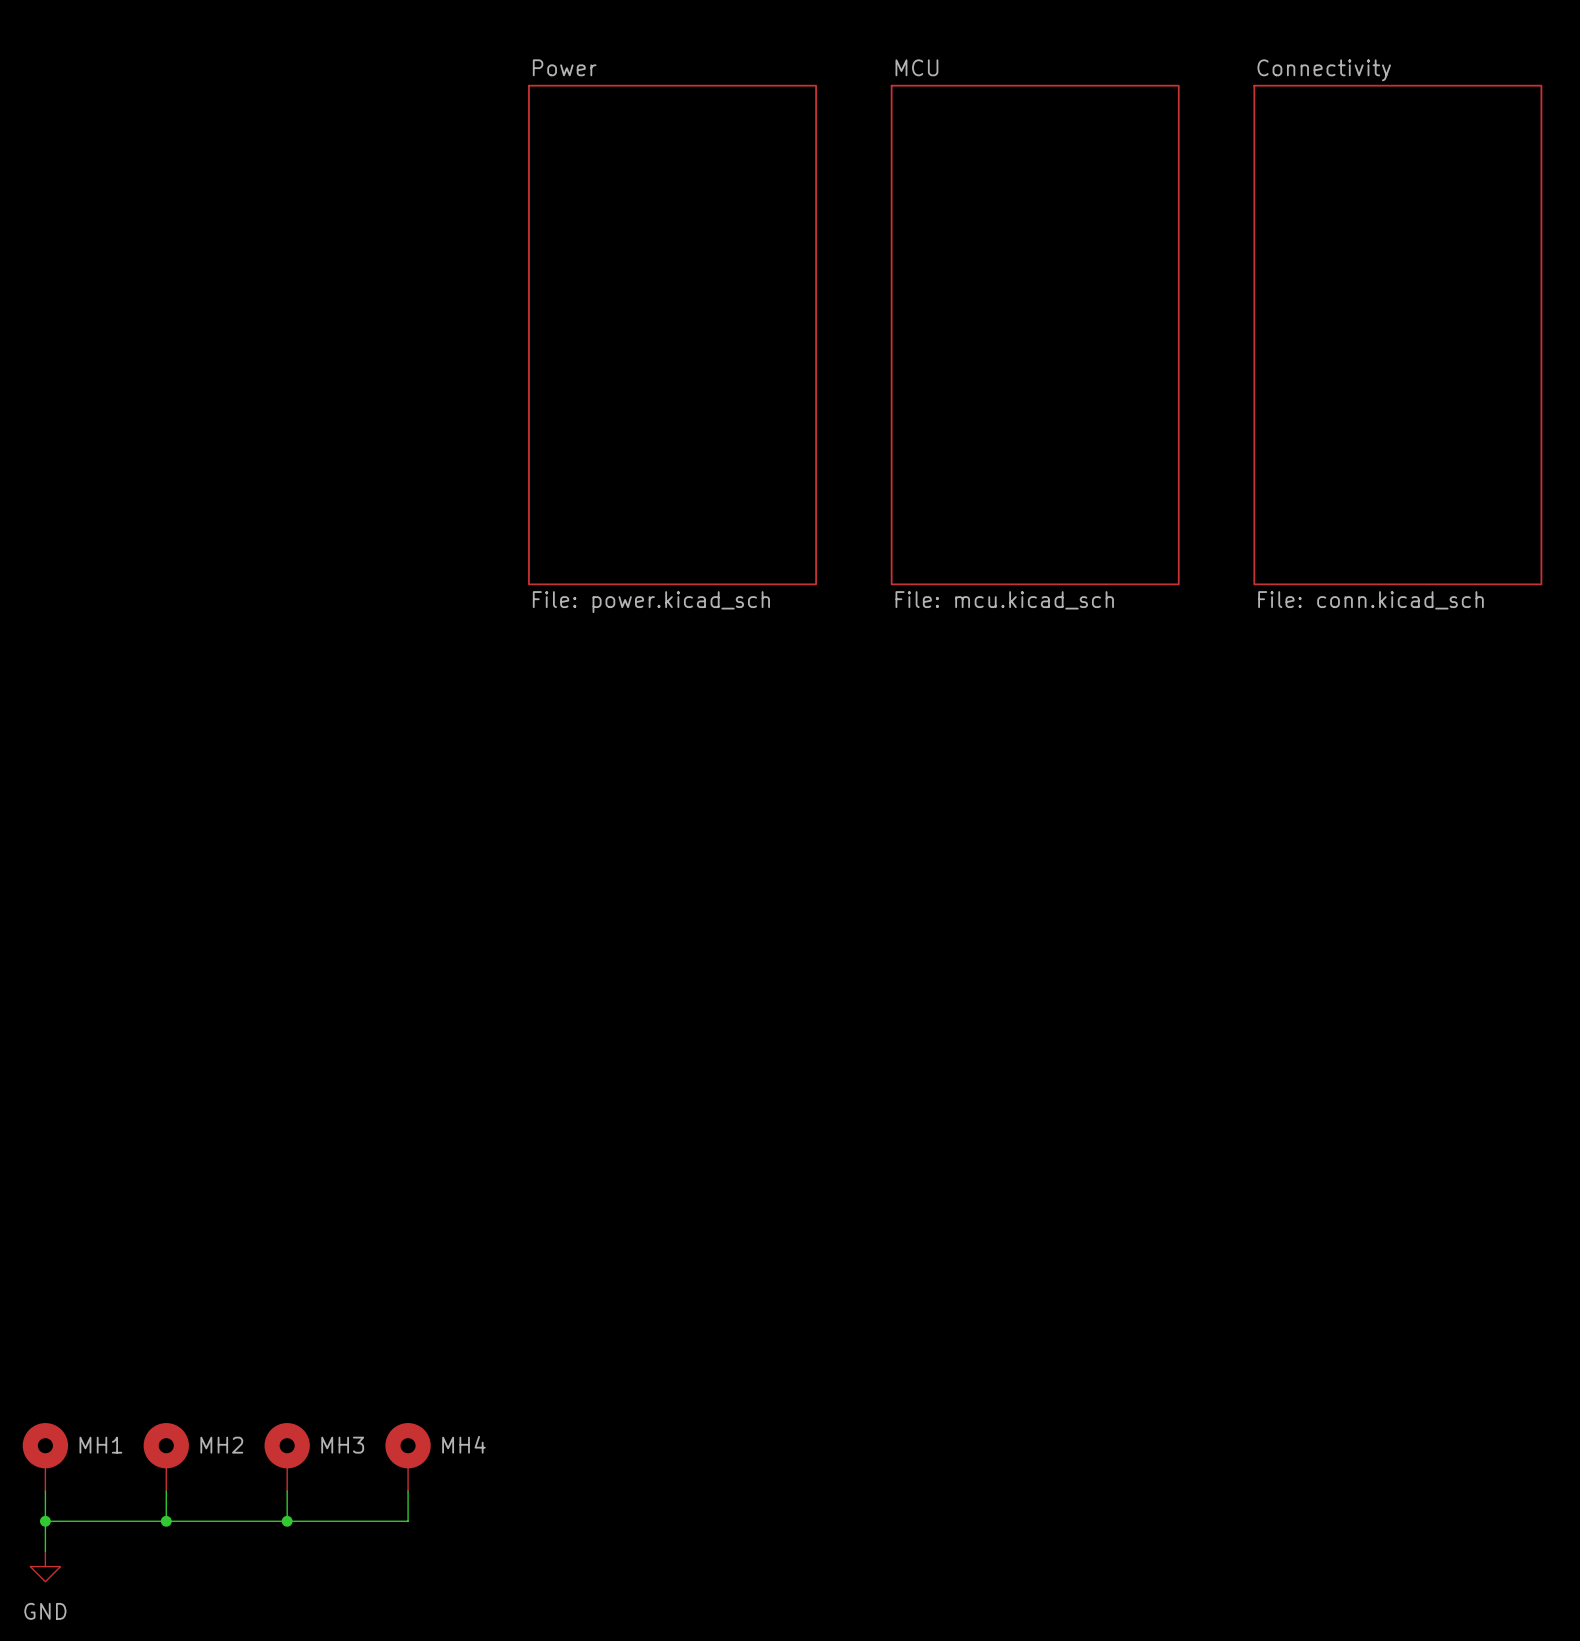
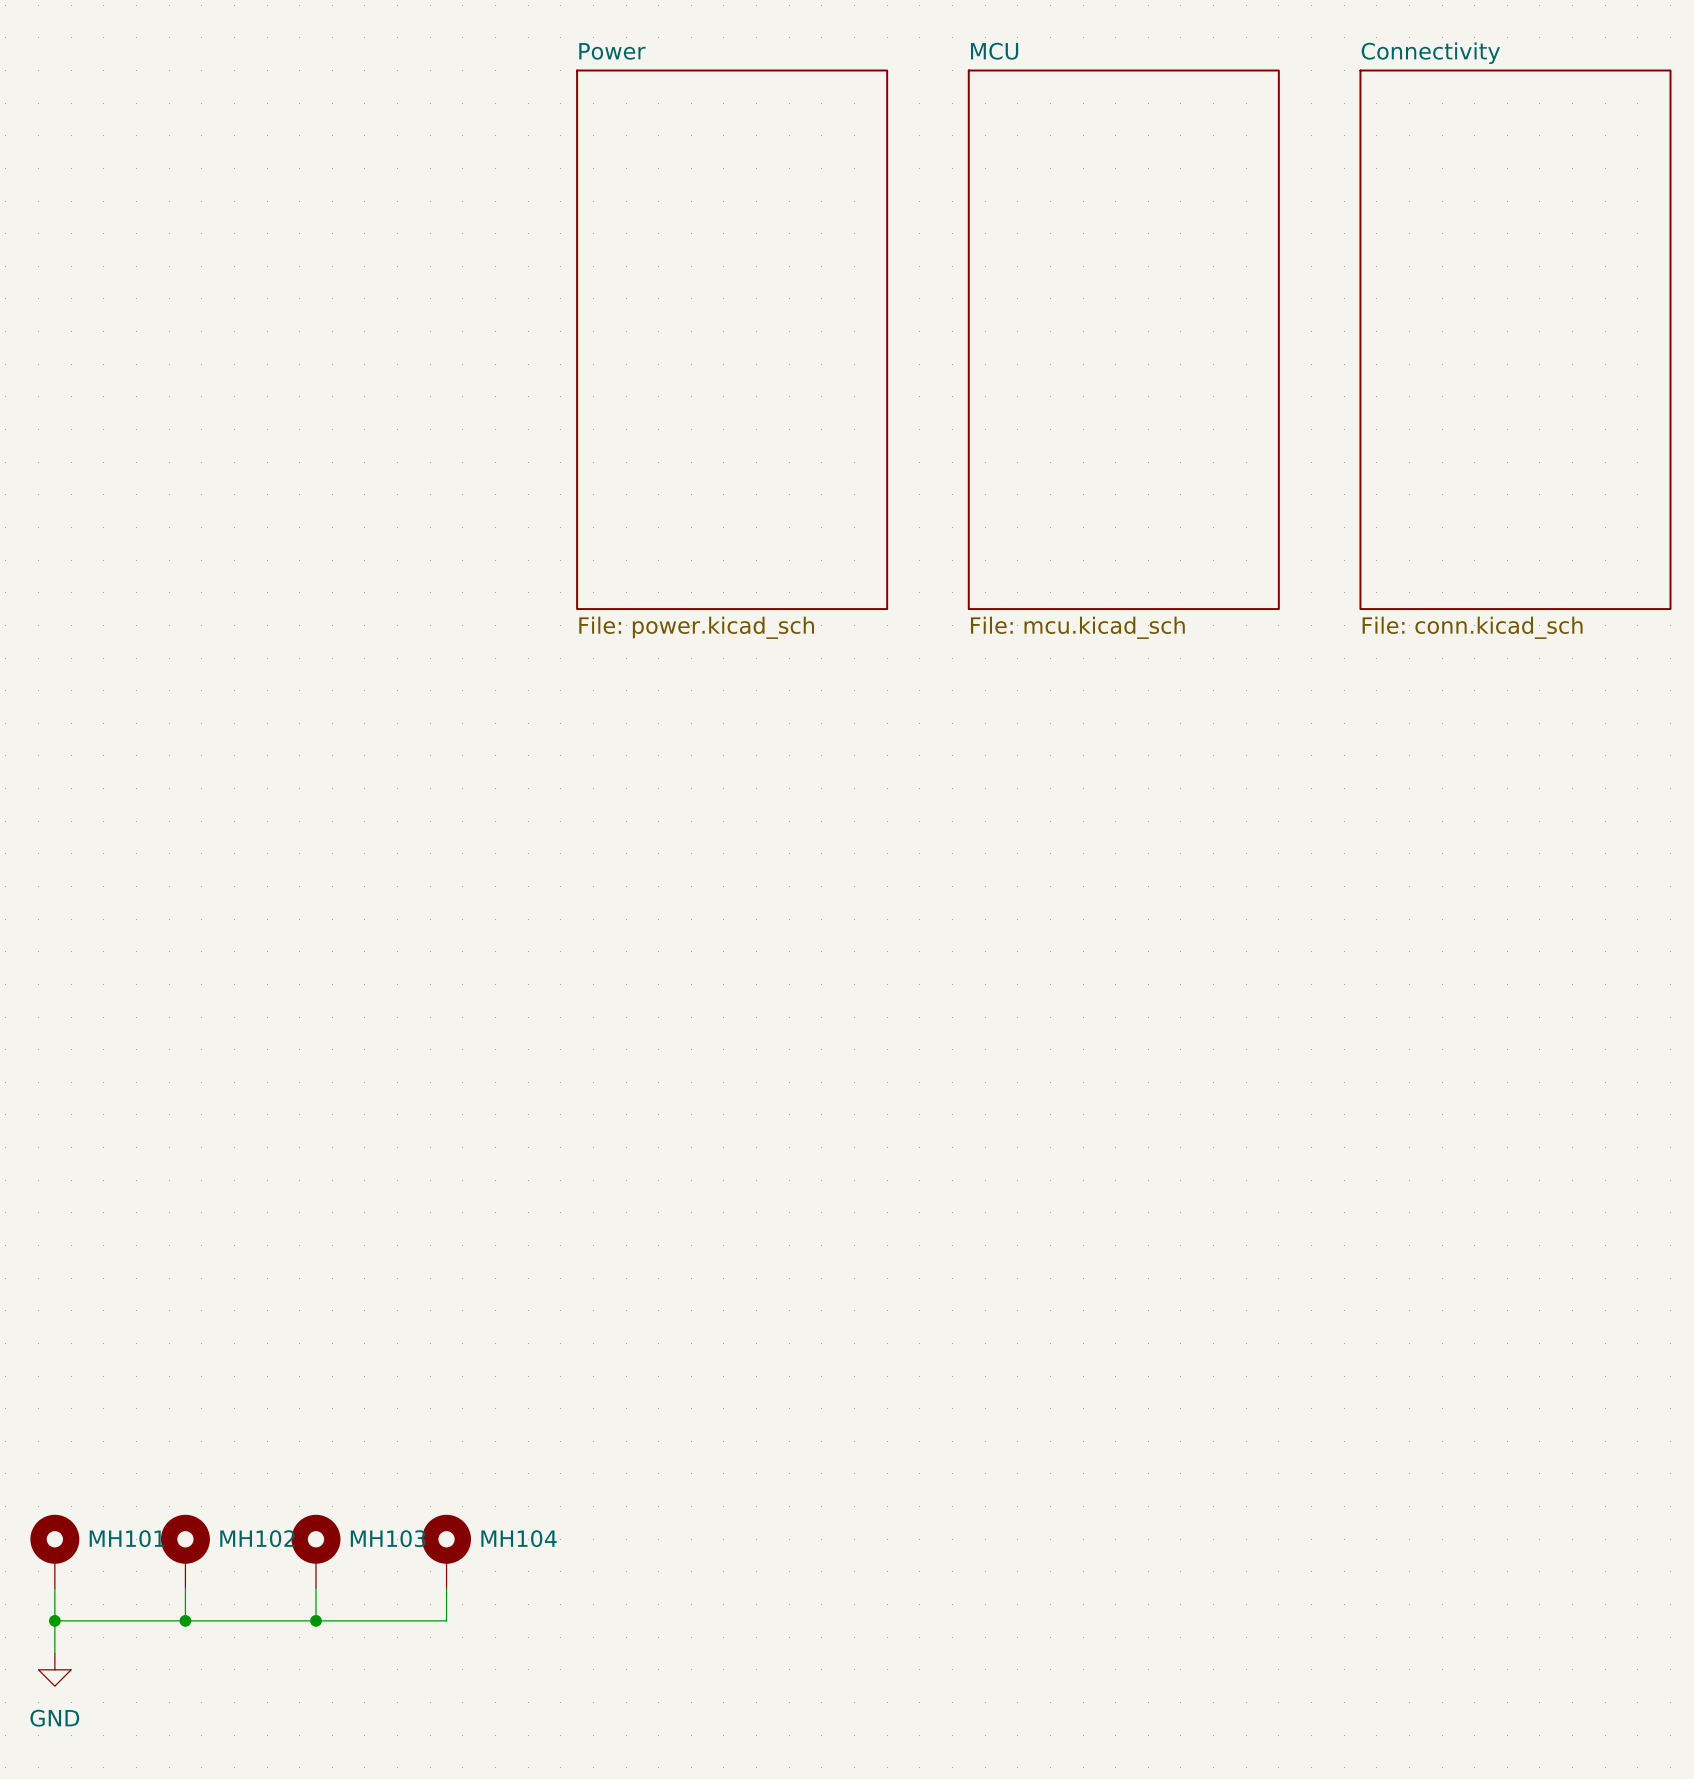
MH4 name: MH4 (463, 1444) -> MH104 (519, 1538)
MH1 name: MH1 (100, 1445) -> MH101 (127, 1538)
MH2 name: MH2 (221, 1445) -> MH102 (257, 1538)
MH3 name: MH3 (342, 1445) -> MH103 (388, 1538)

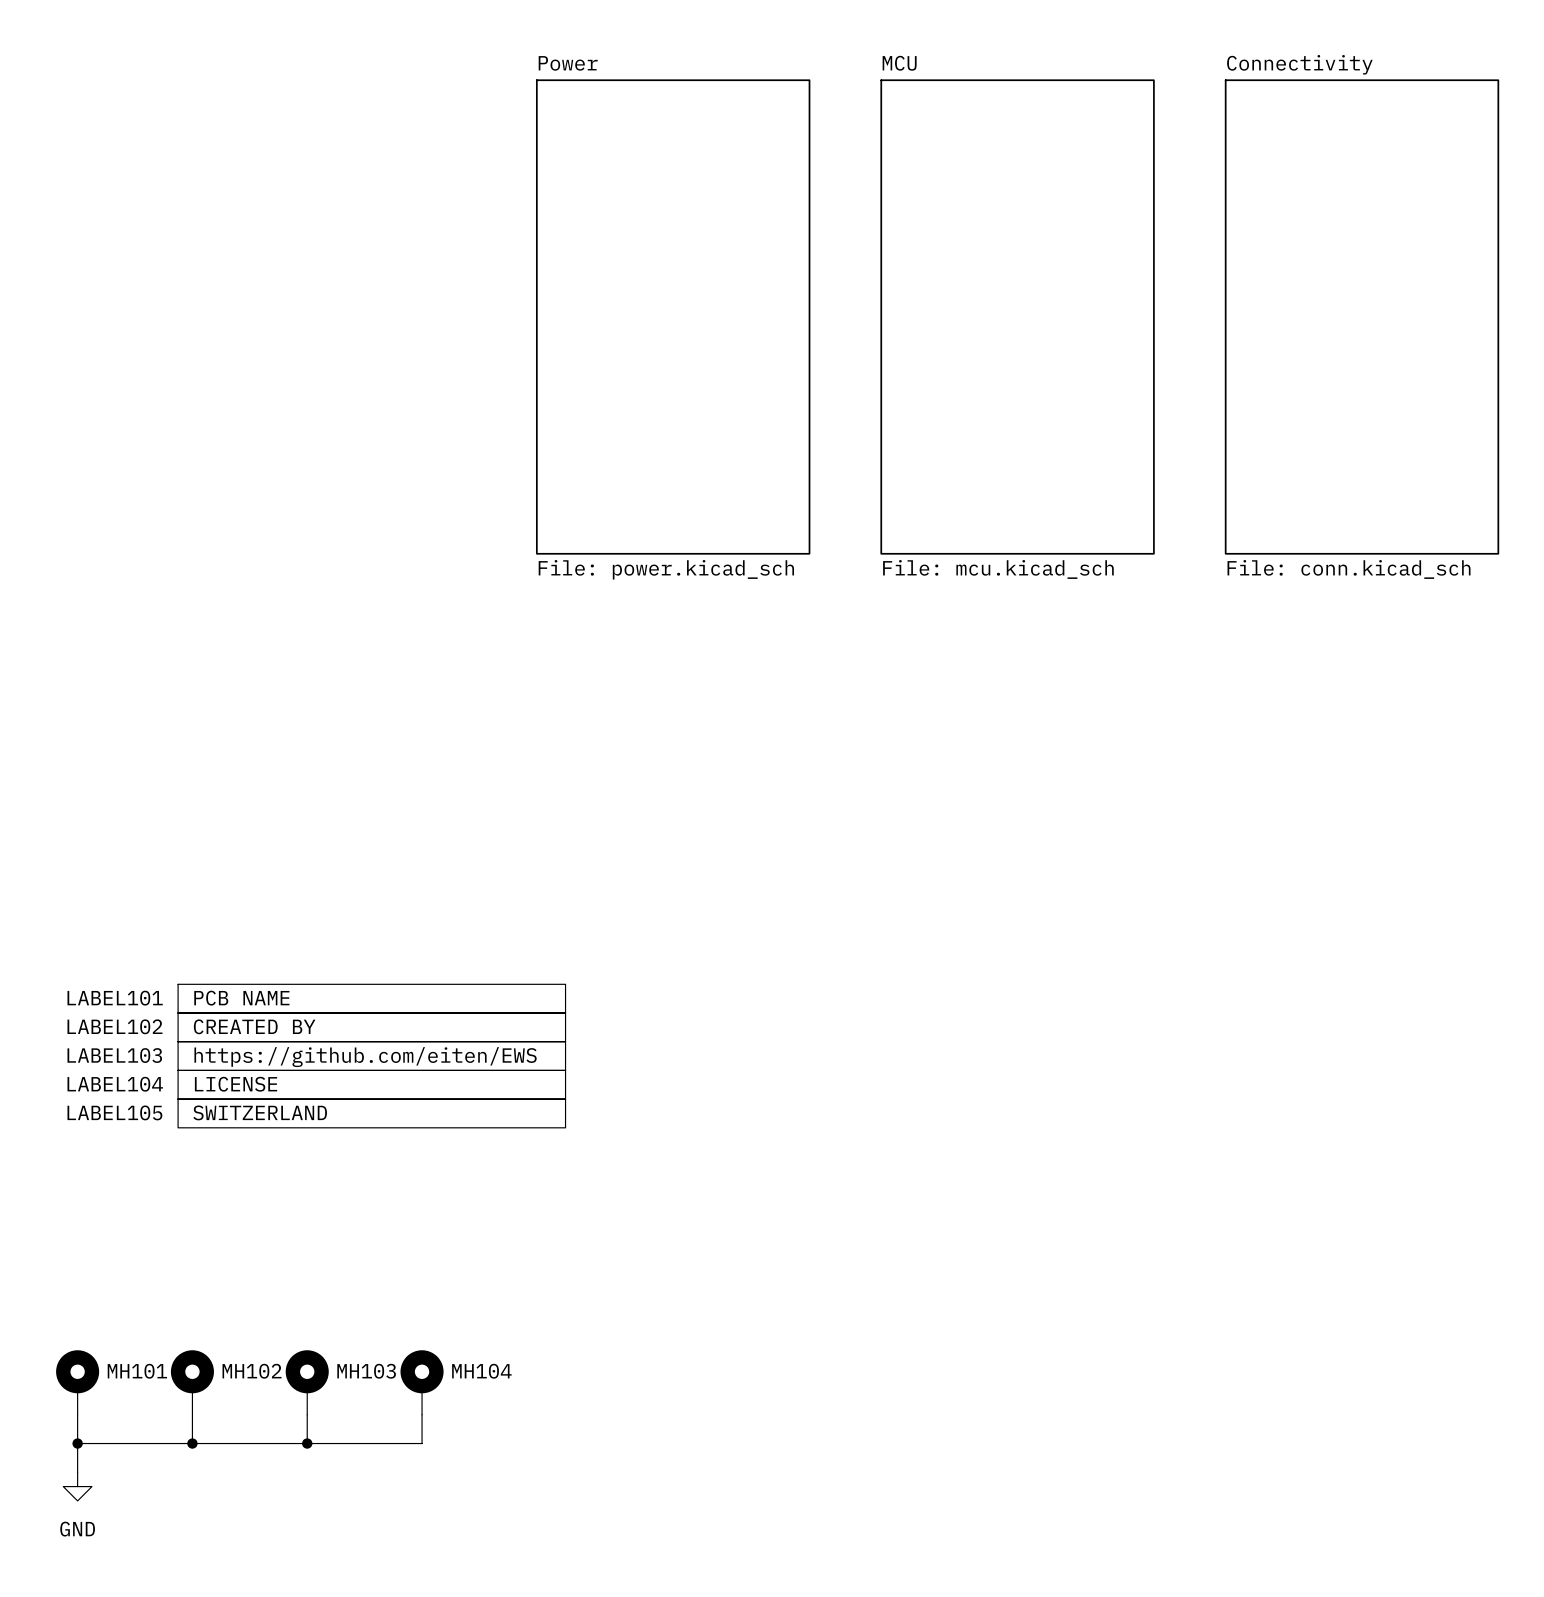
LABEL101: none -> PCB NAME (371, 998)
LABEL102: none -> CREATED BY (371, 1027)
LABEL103: none -> https://github.com/eiten/EWS (371, 1056)
LABEL104: none -> LICENSE (371, 1084)
LABEL105: none -> SWITZERLAND (371, 1113)

